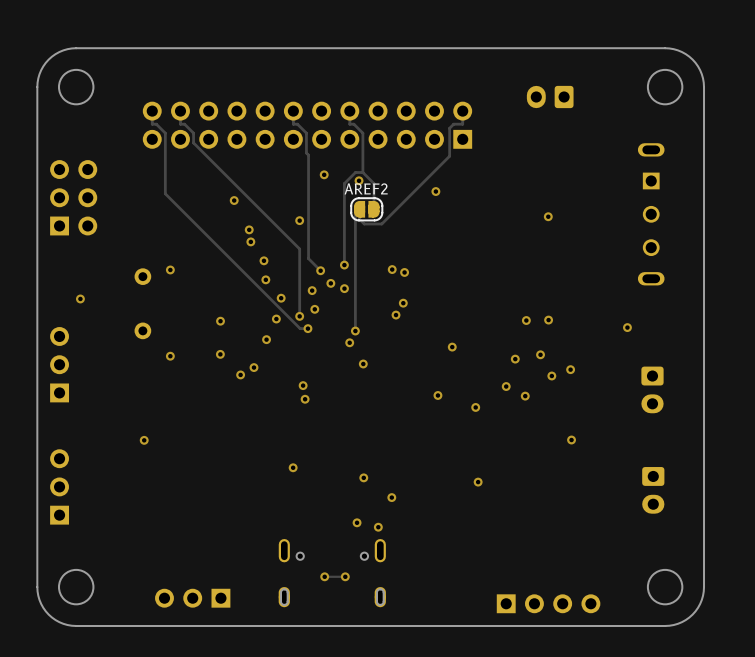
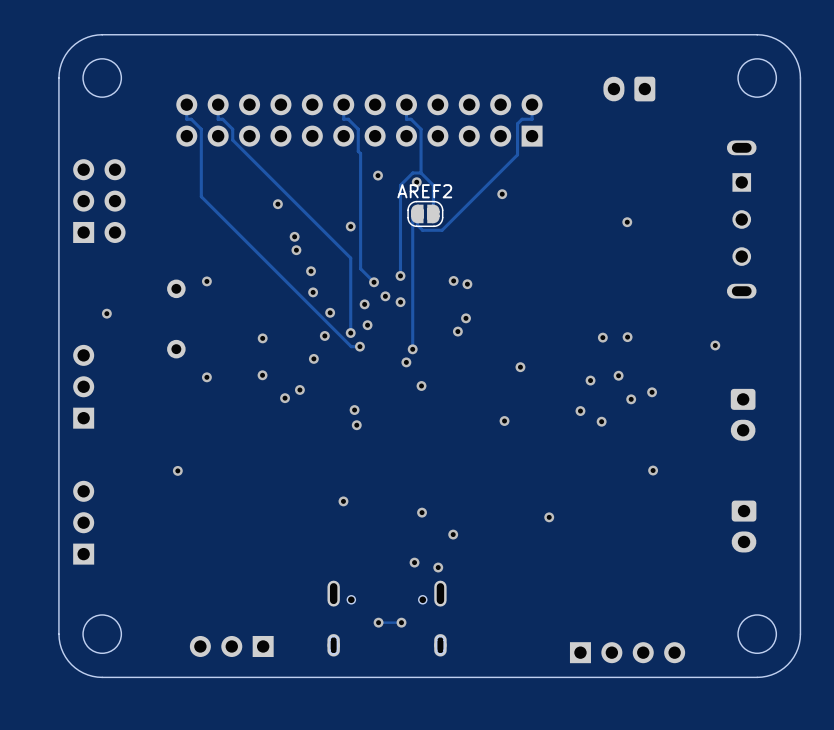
via: (475, 407) -> none

